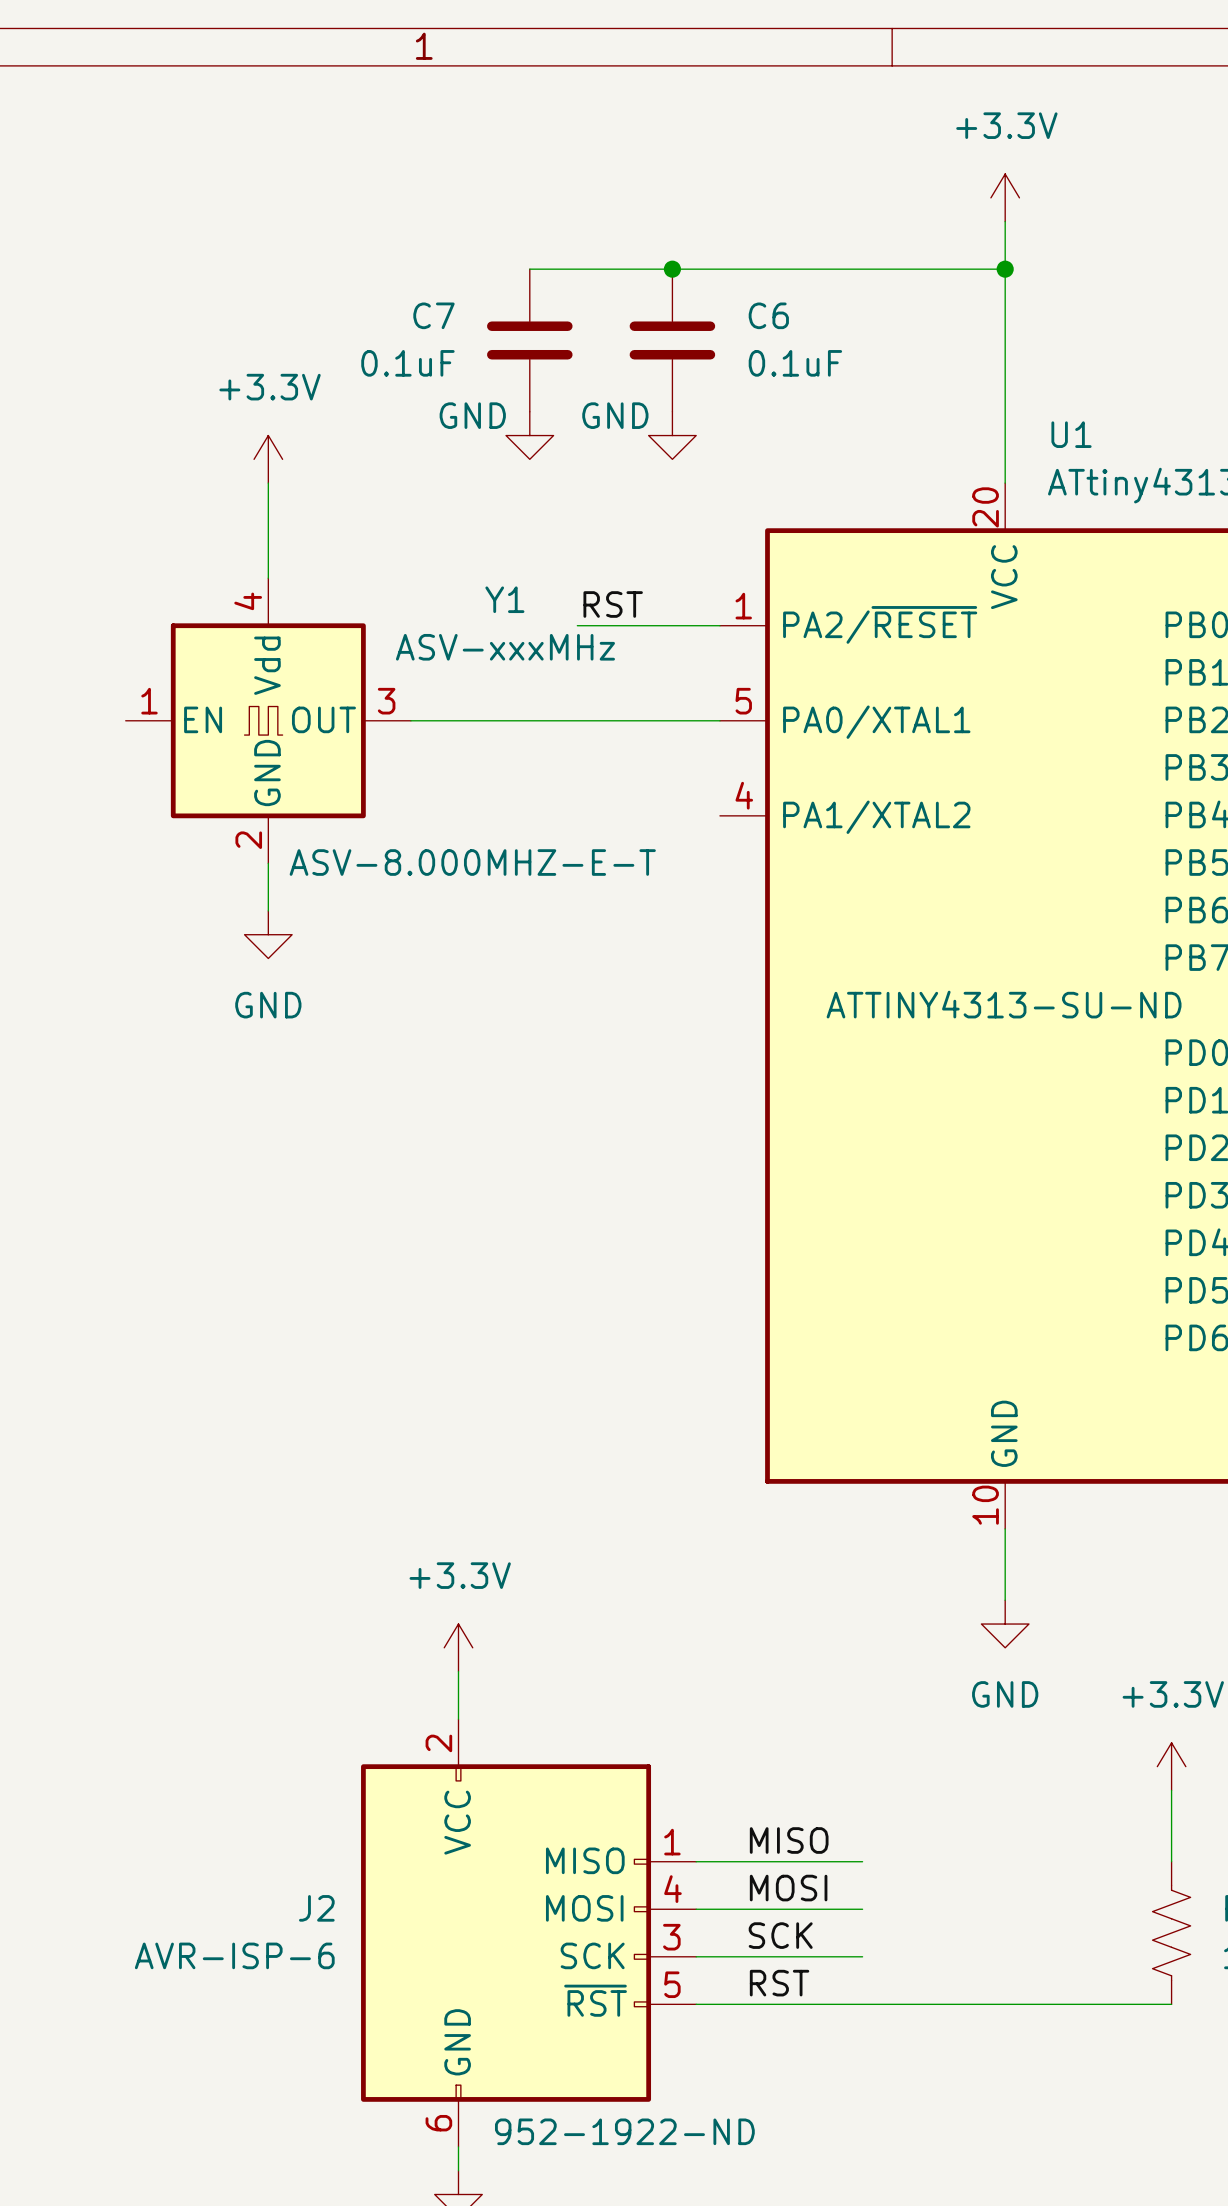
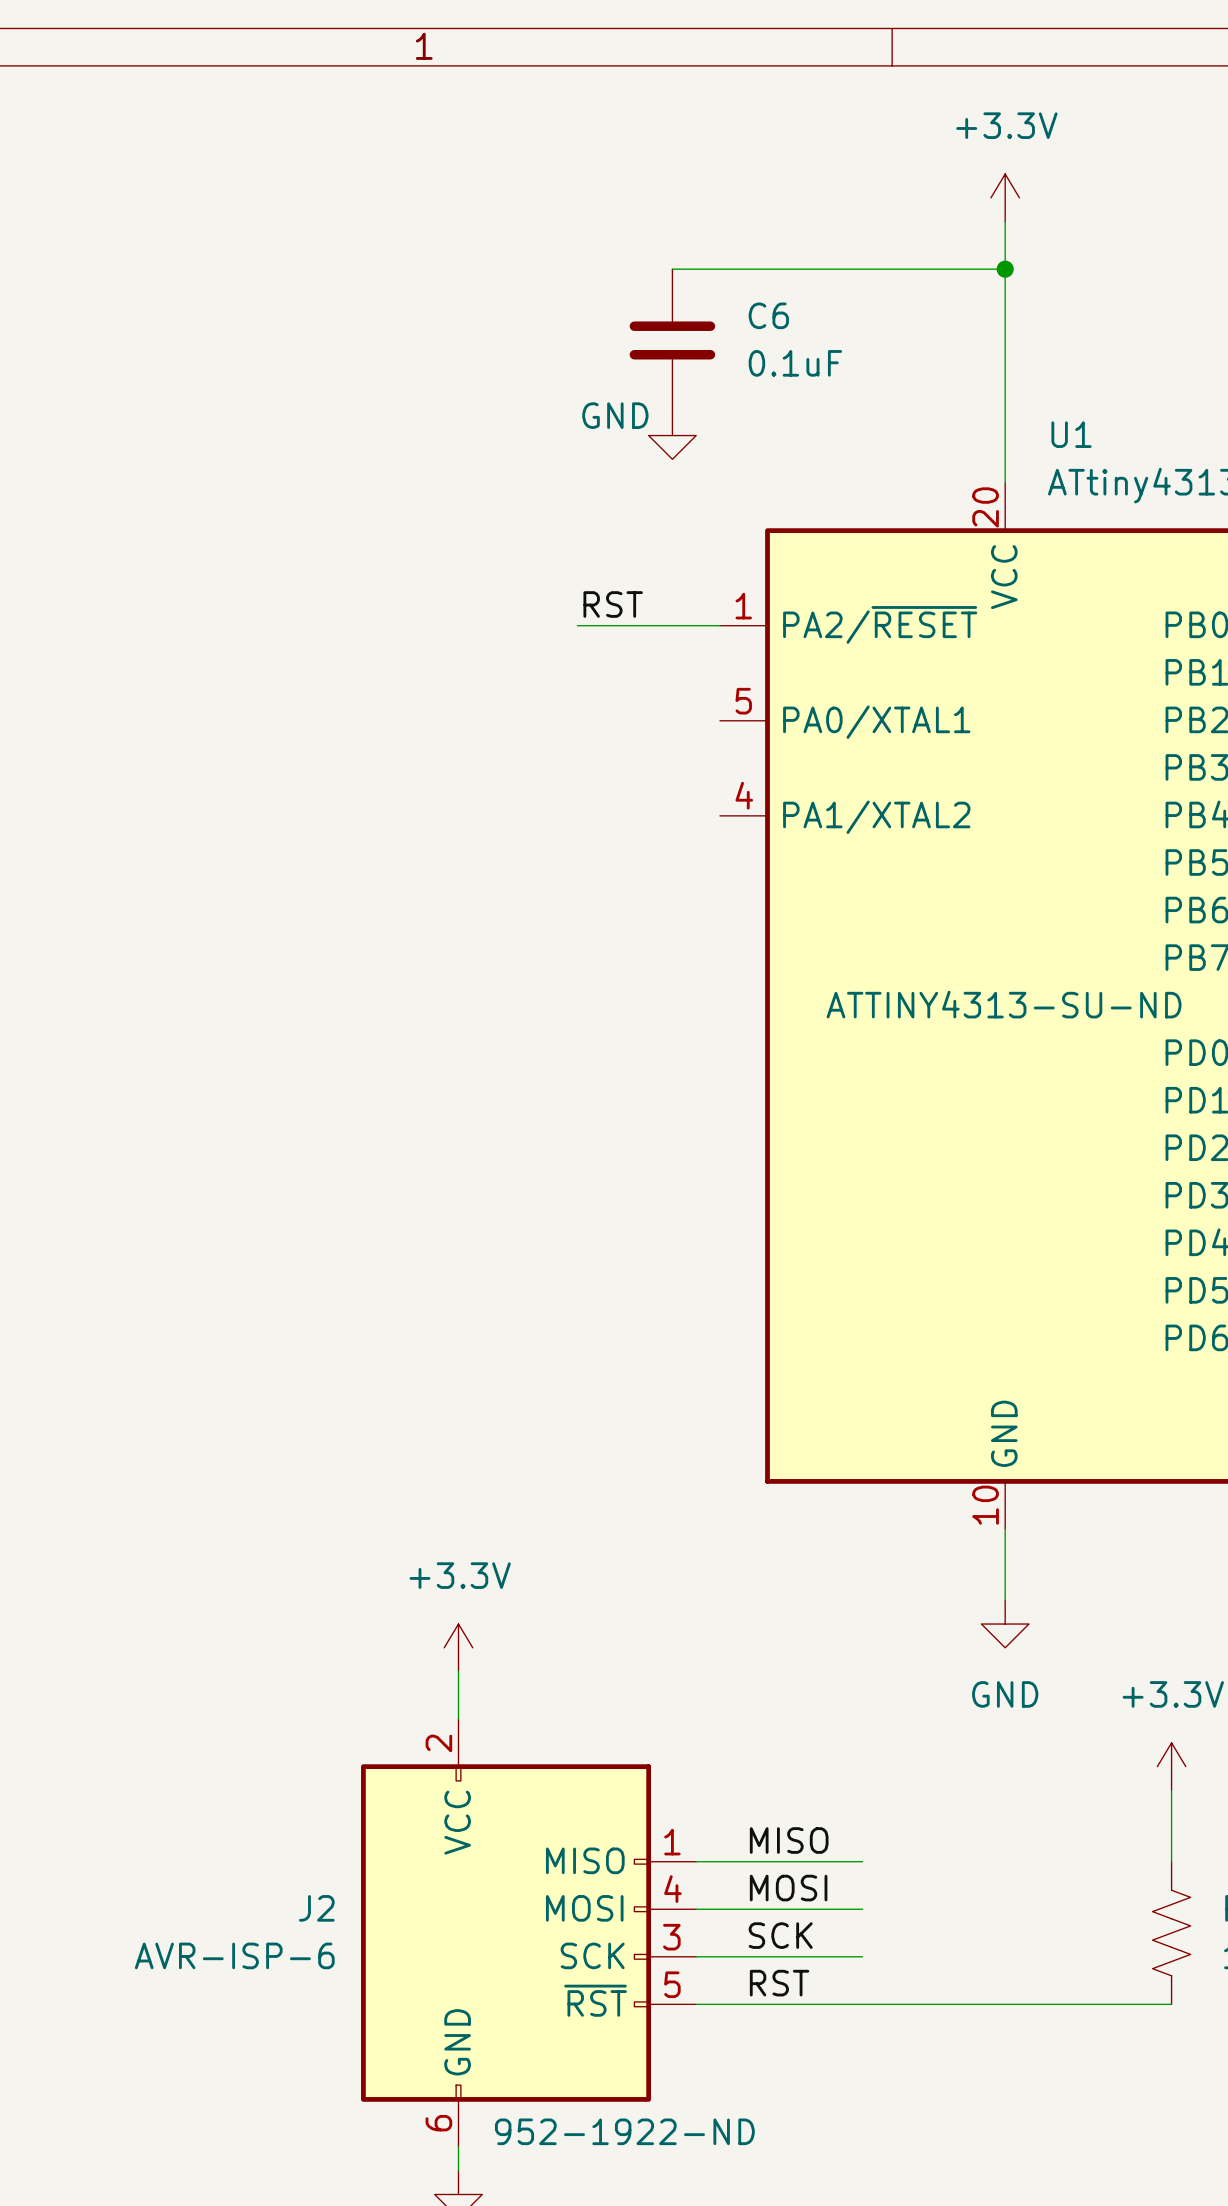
wire: (529, 269) (672, 269) -> none
junction: (672, 269) -> none
C7: 0.1uF (529, 340) -> none
power symbol: GND (529, 435) -> none
power symbol: +3.3V (268, 459) -> none
wire: (268, 483) (268, 578) -> none
Y1: ASV-xxxMHz (268, 720) -> none
wire: (410, 720) (719, 720) -> none
wire: (268, 863) (268, 910) -> none
power symbol: GND (268, 934) -> none

